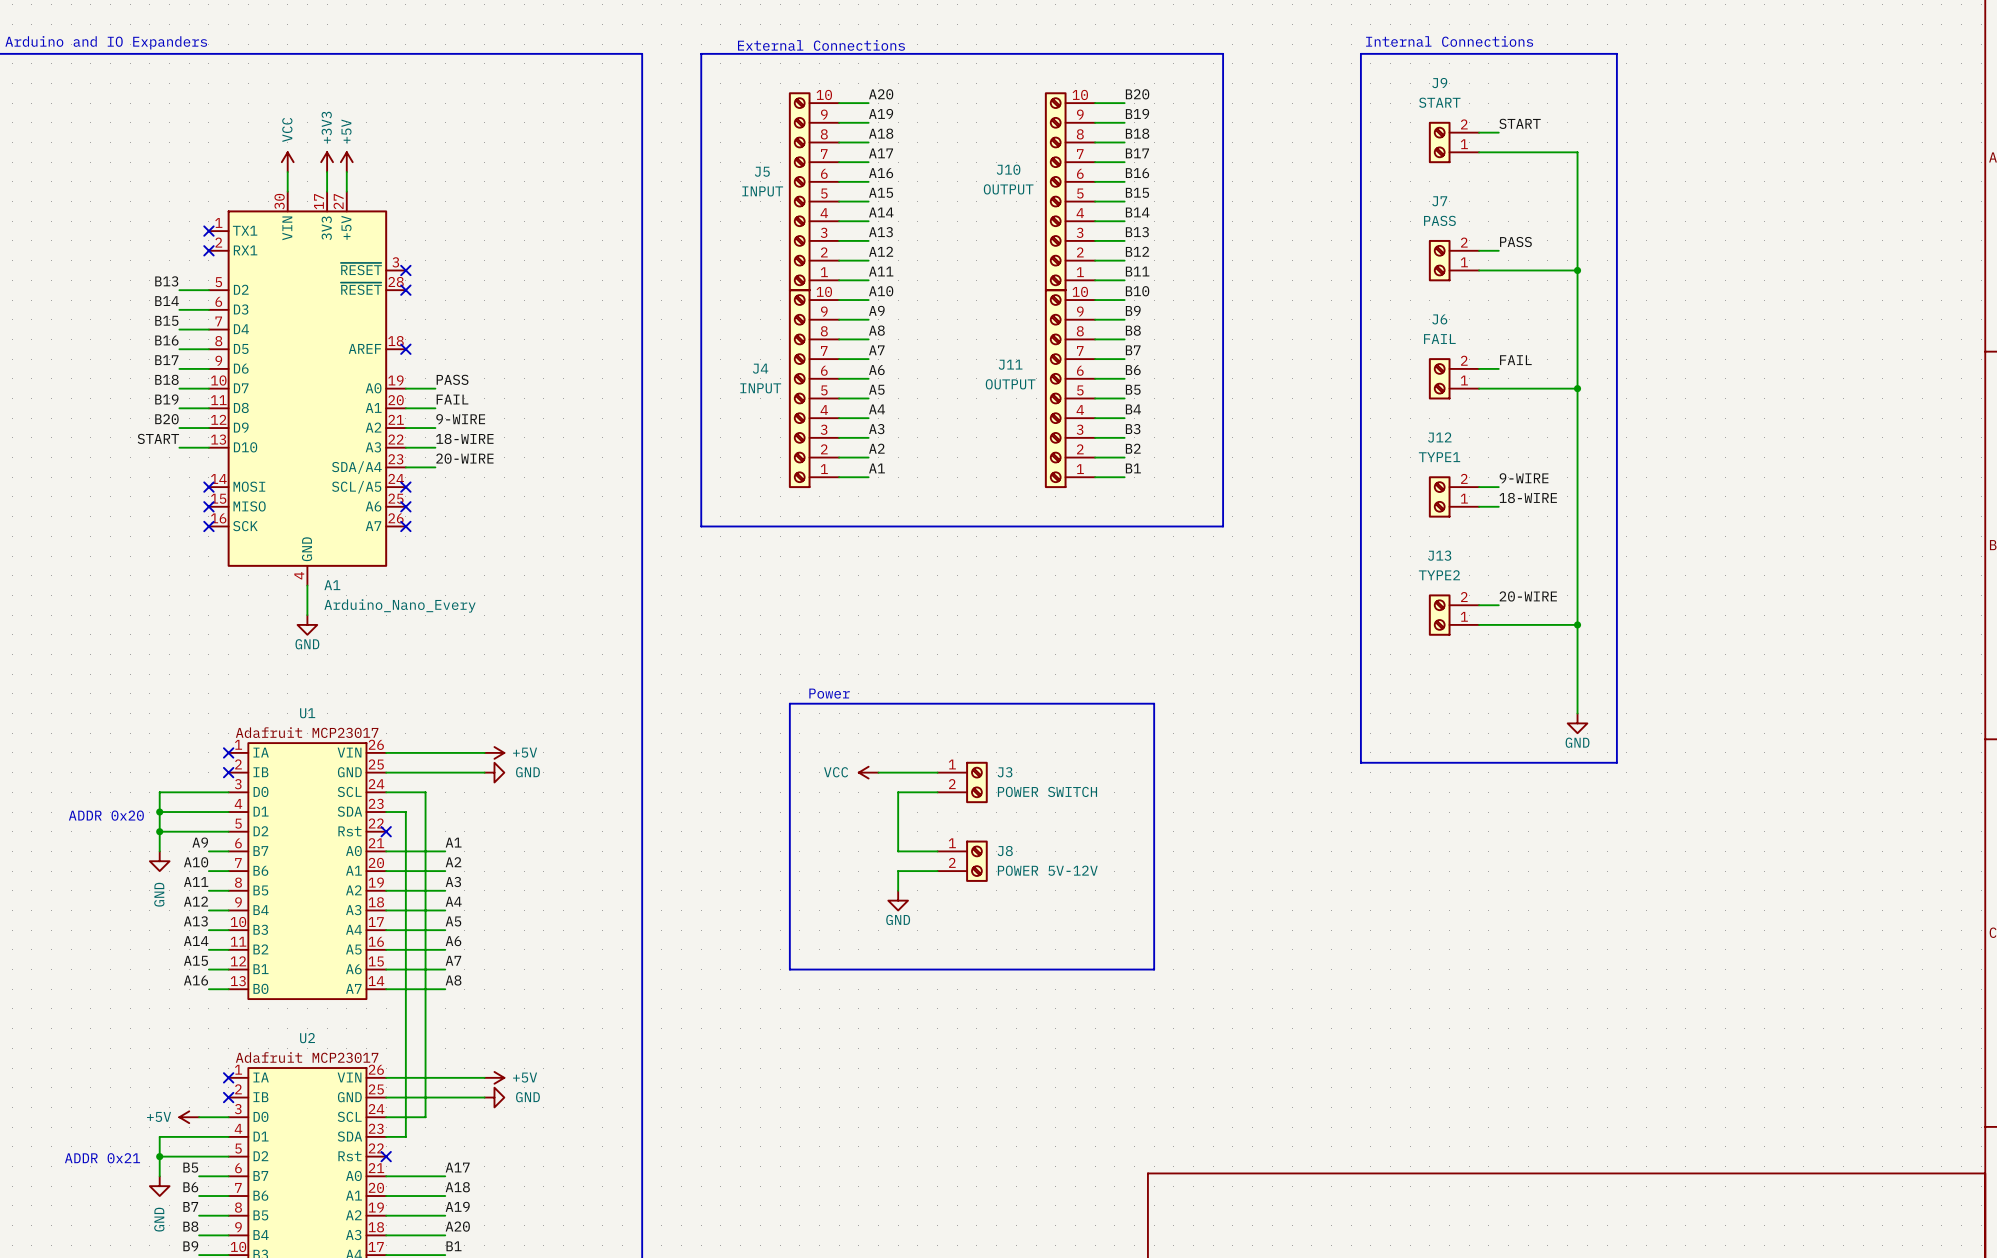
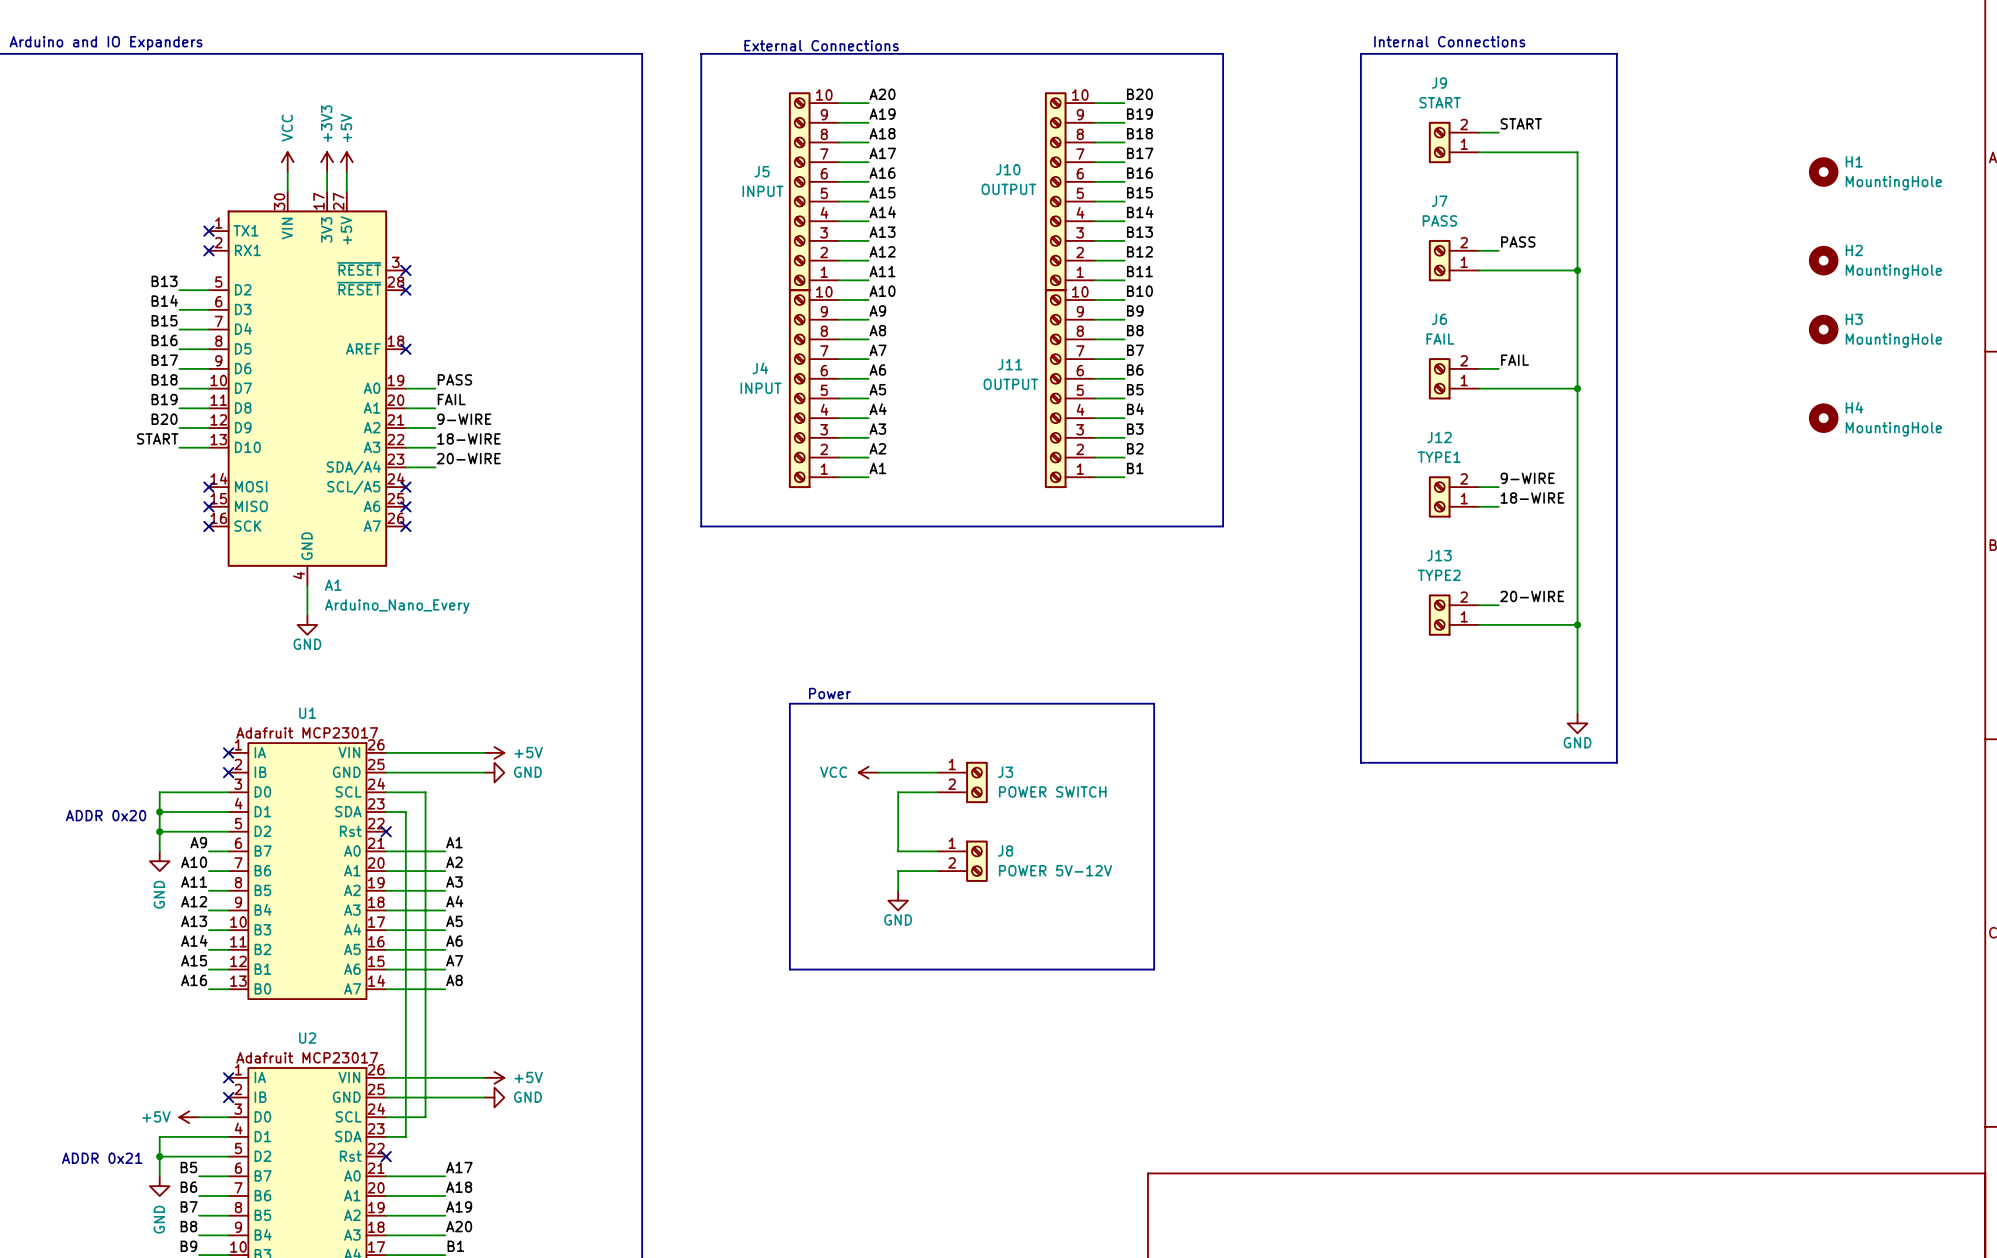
H1: none -> MountingHole (1823, 172)
H2: none -> MountingHole (1823, 260)
H3: none -> MountingHole (1823, 329)
H4: none -> MountingHole (1823, 418)

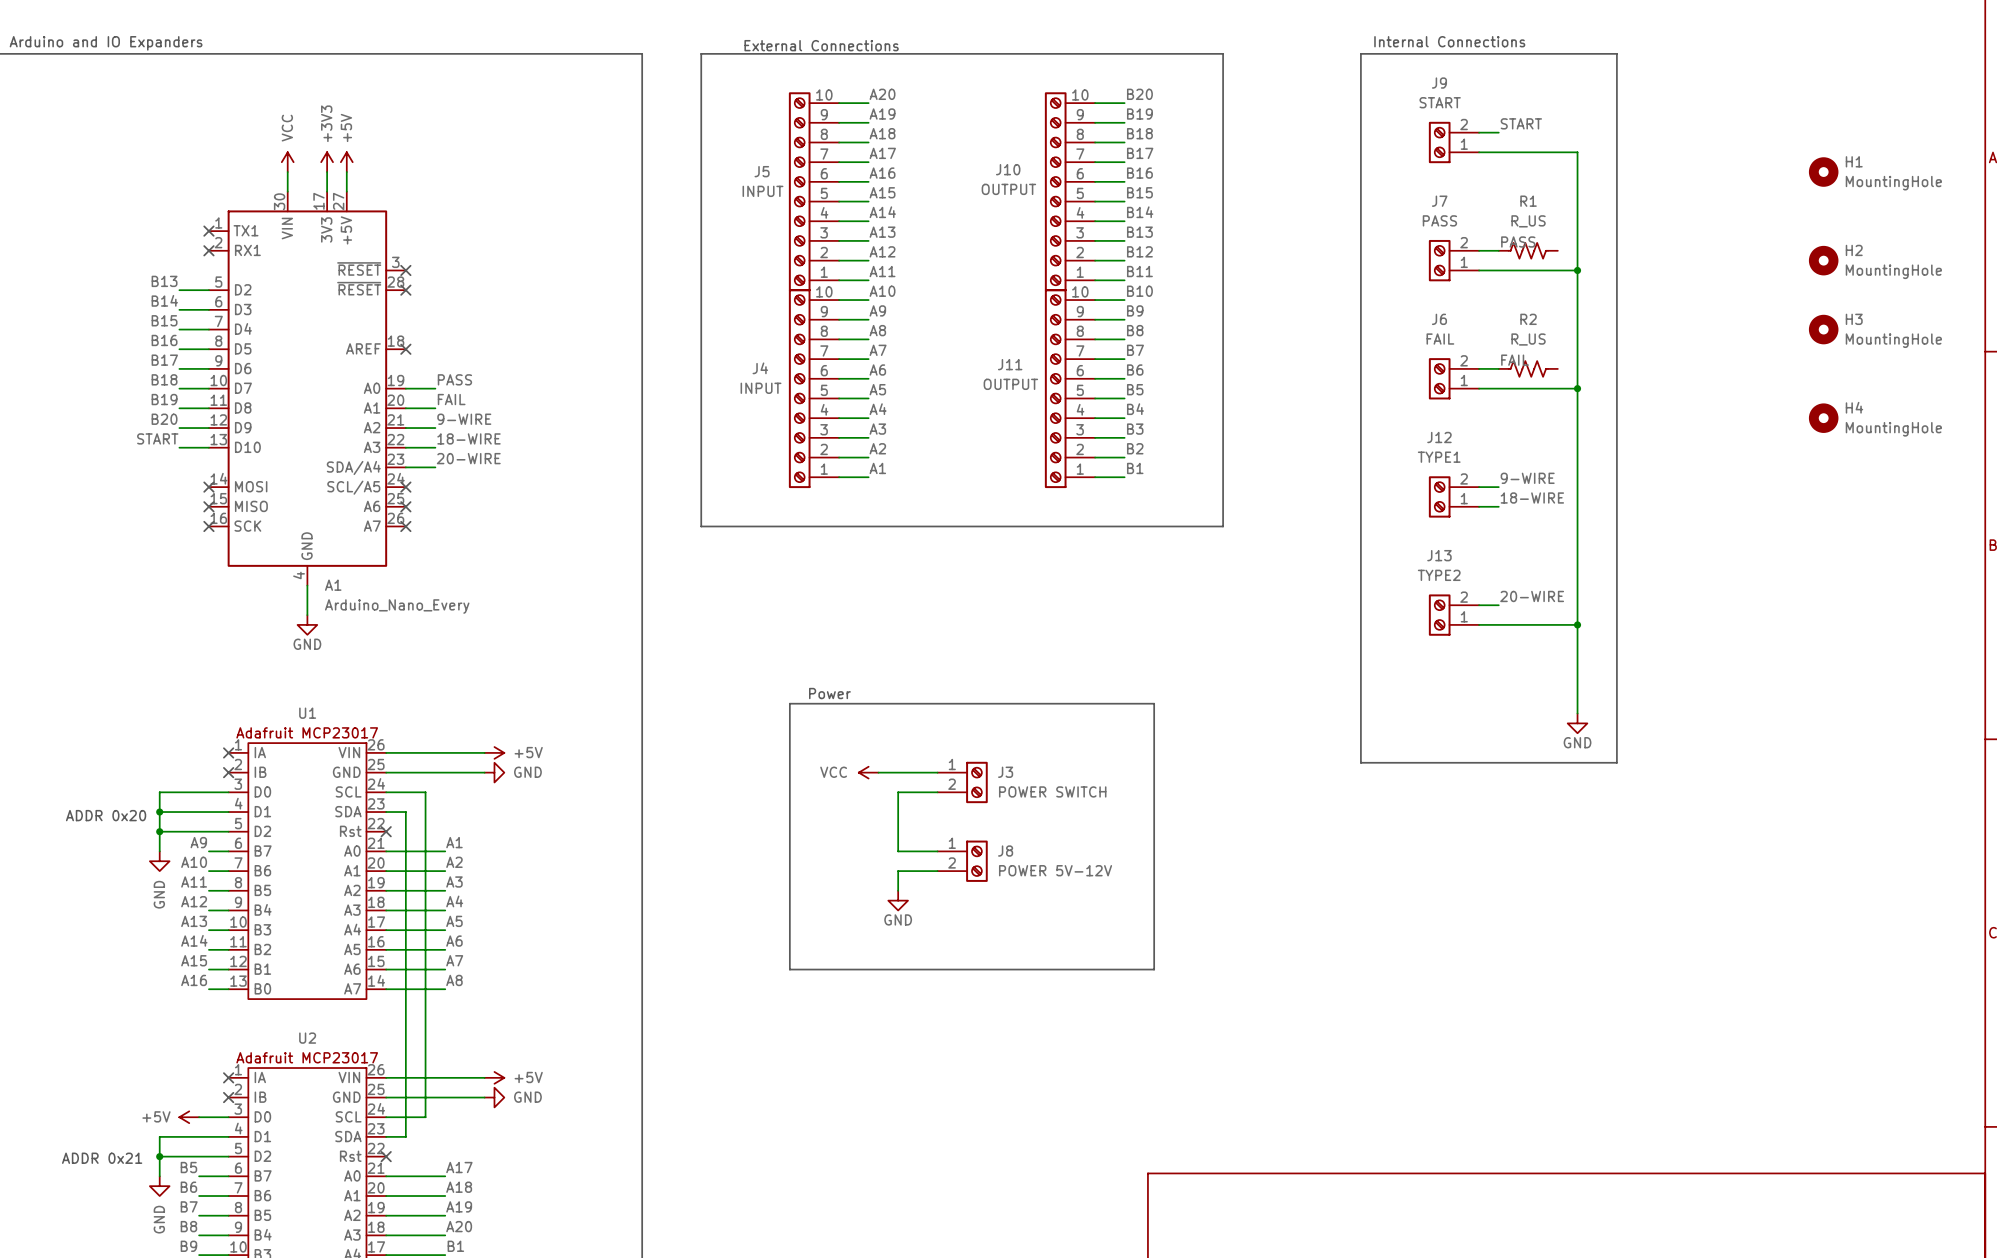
R1: none -> R_US (1528, 250)
R2: none -> R_US (1528, 368)

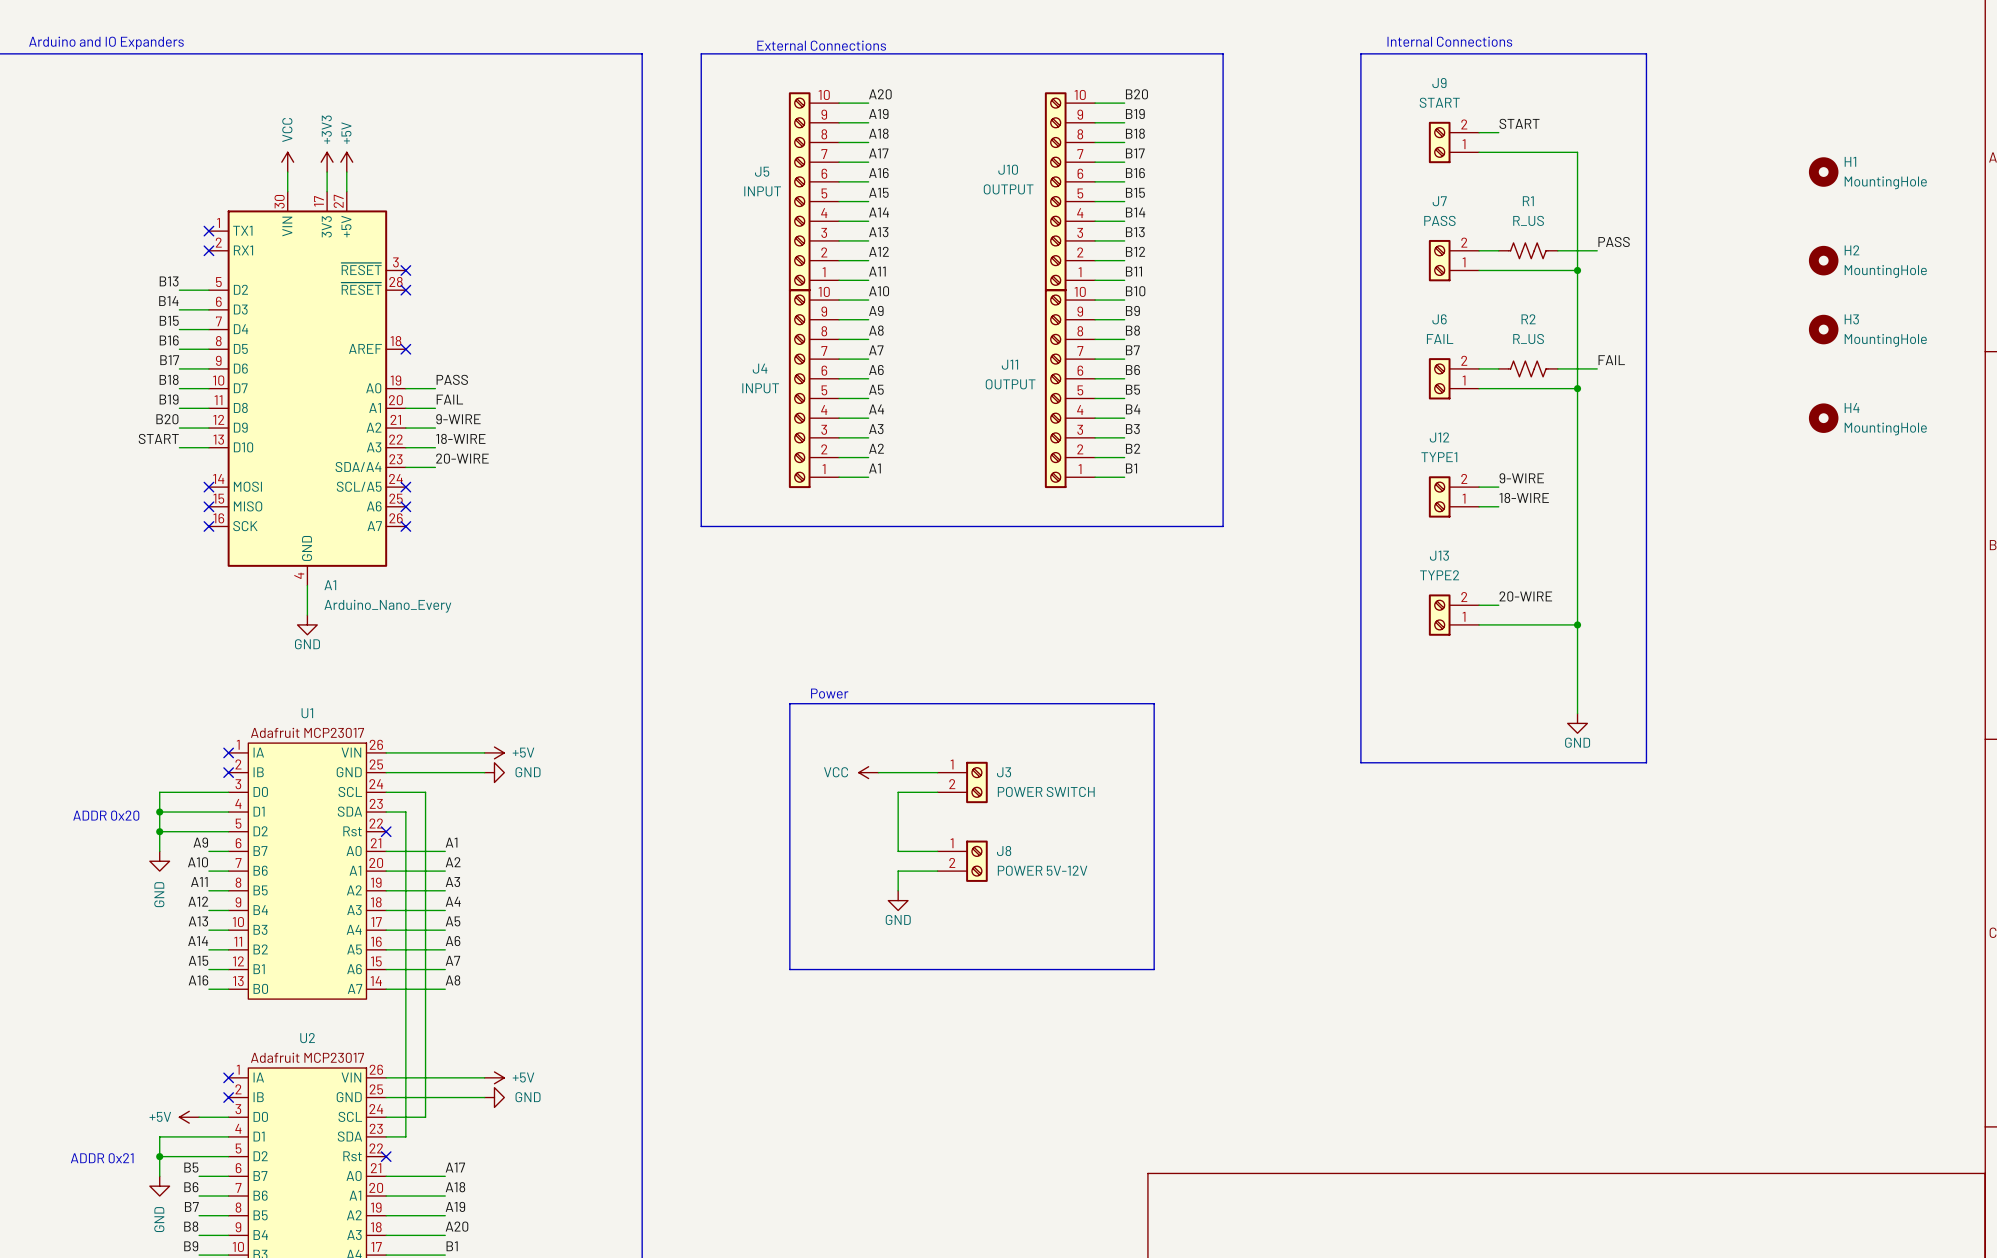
line: (1616, 53) (1616, 762) -> (1616, 53) (1646, 53) (1646, 762) (1616, 762)
label position: PASS (1518, 242) -> PASS (1614, 242)
wire: none -> (1557, 250) (1597, 250)
label position: FAIL (1515, 360) -> FAIL (1611, 360)
wire: none -> (1557, 368) (1597, 368)

